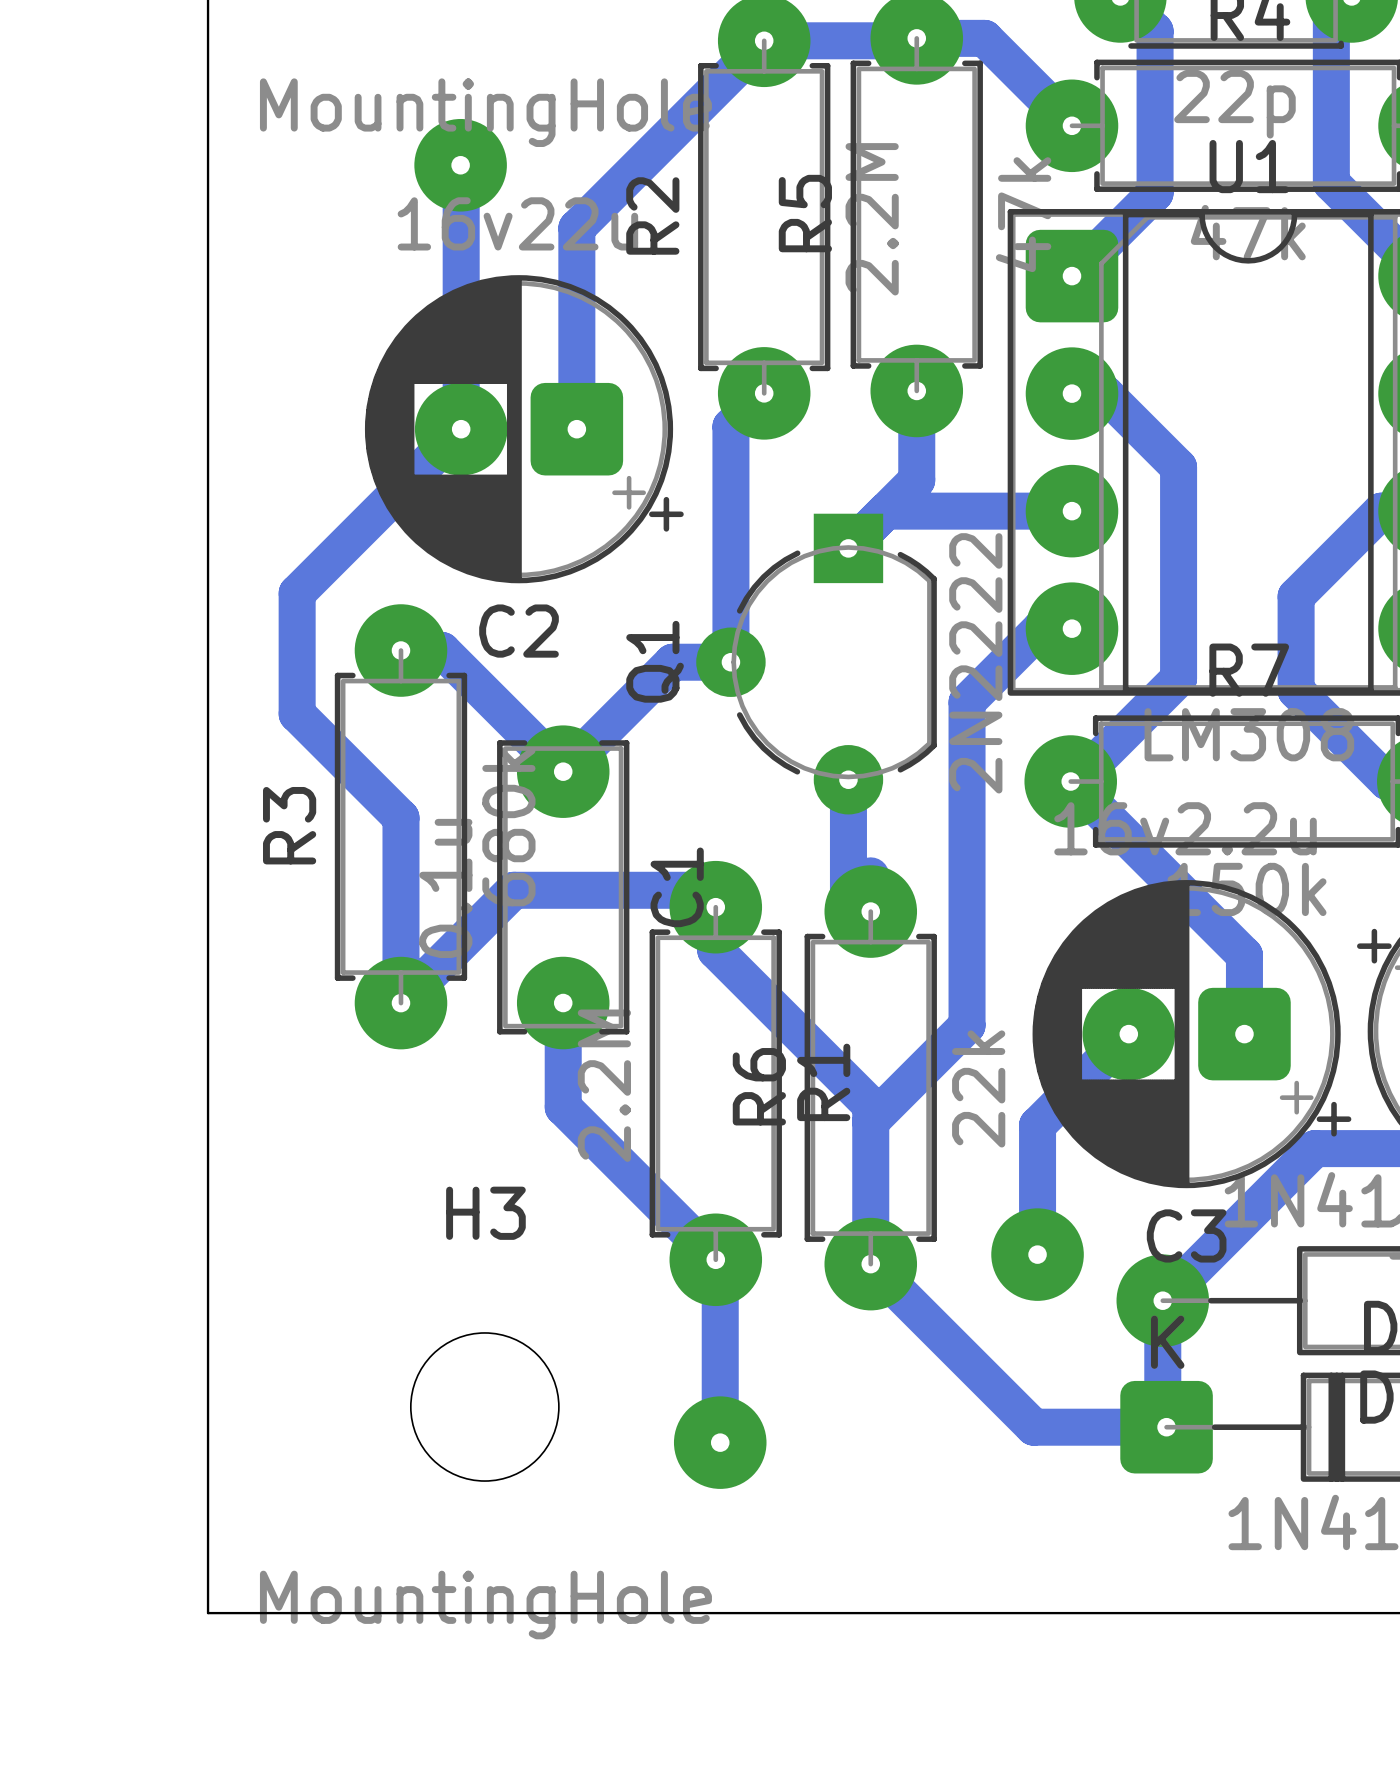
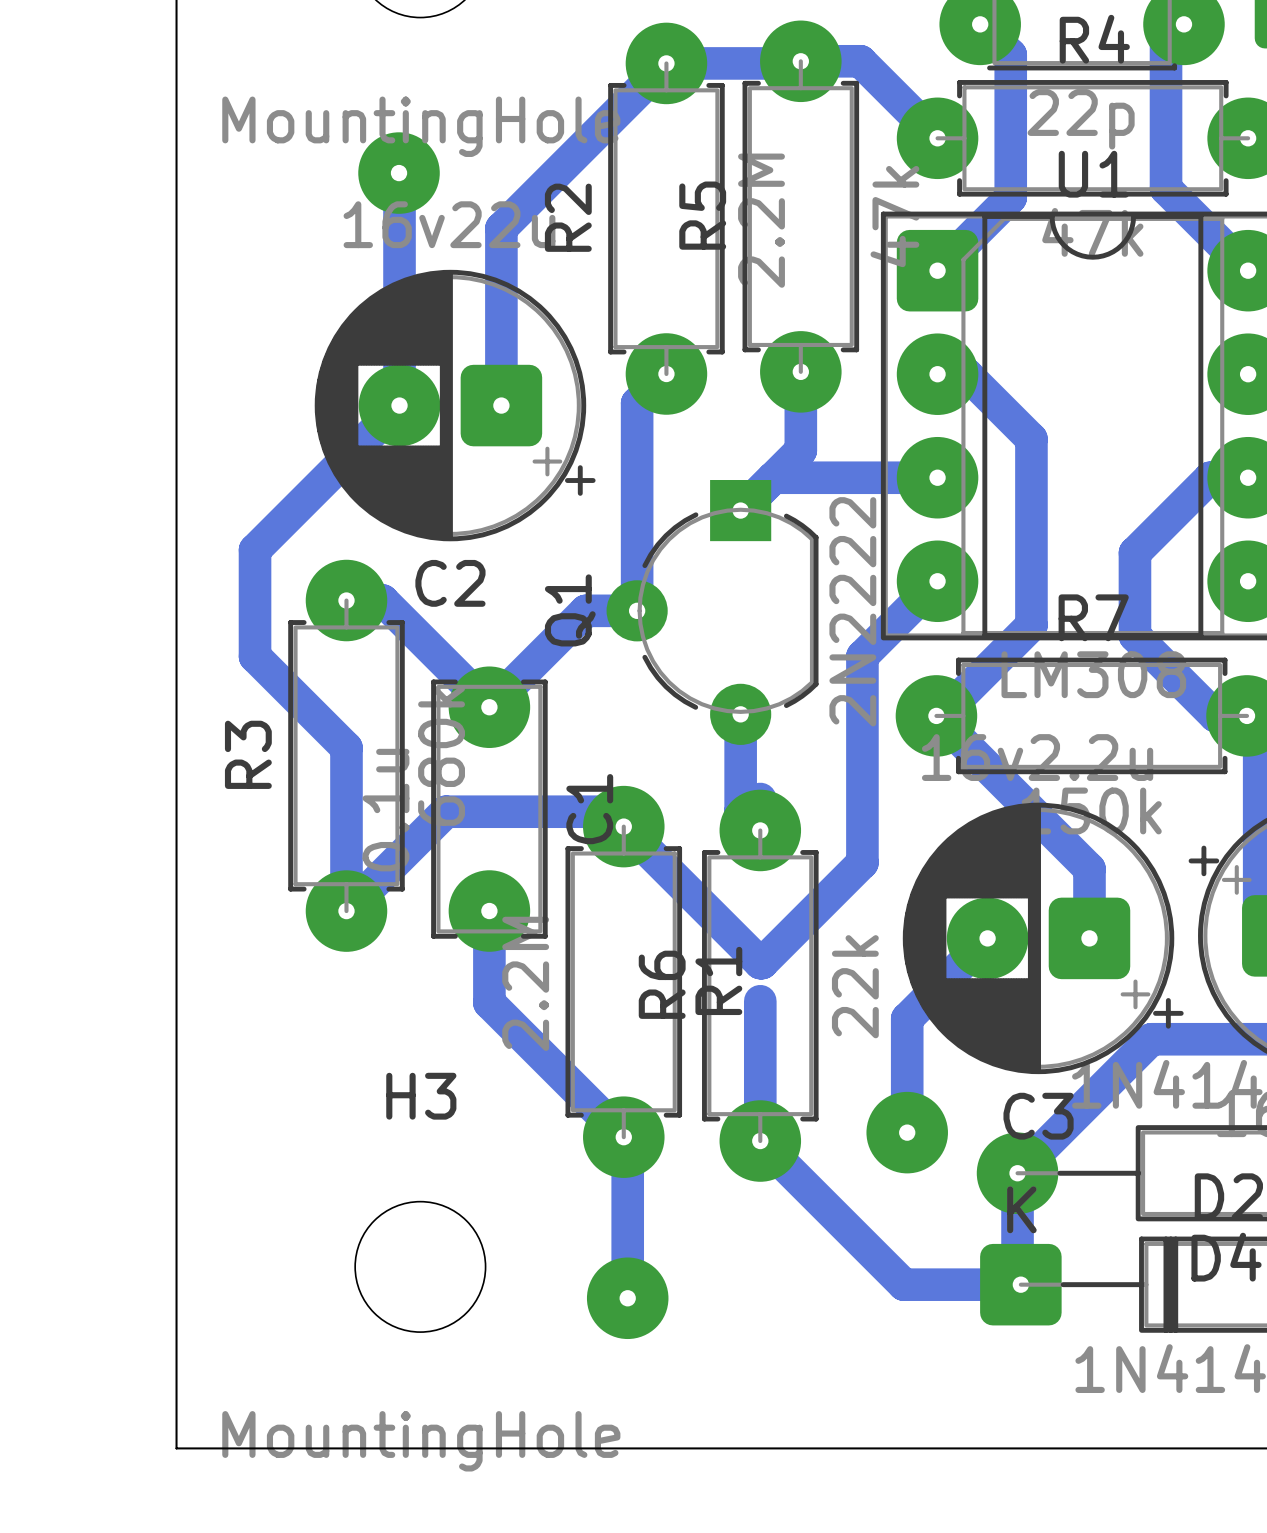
bottom track: (1071, 628) (1040, 628) (967, 702) (967, 1025) (870, 1121) -> (937, 581) (862, 656) (862, 862) (762, 963) (623, 826)
bottom track: (715, 907) (715, 950) (870, 1105) -> none

